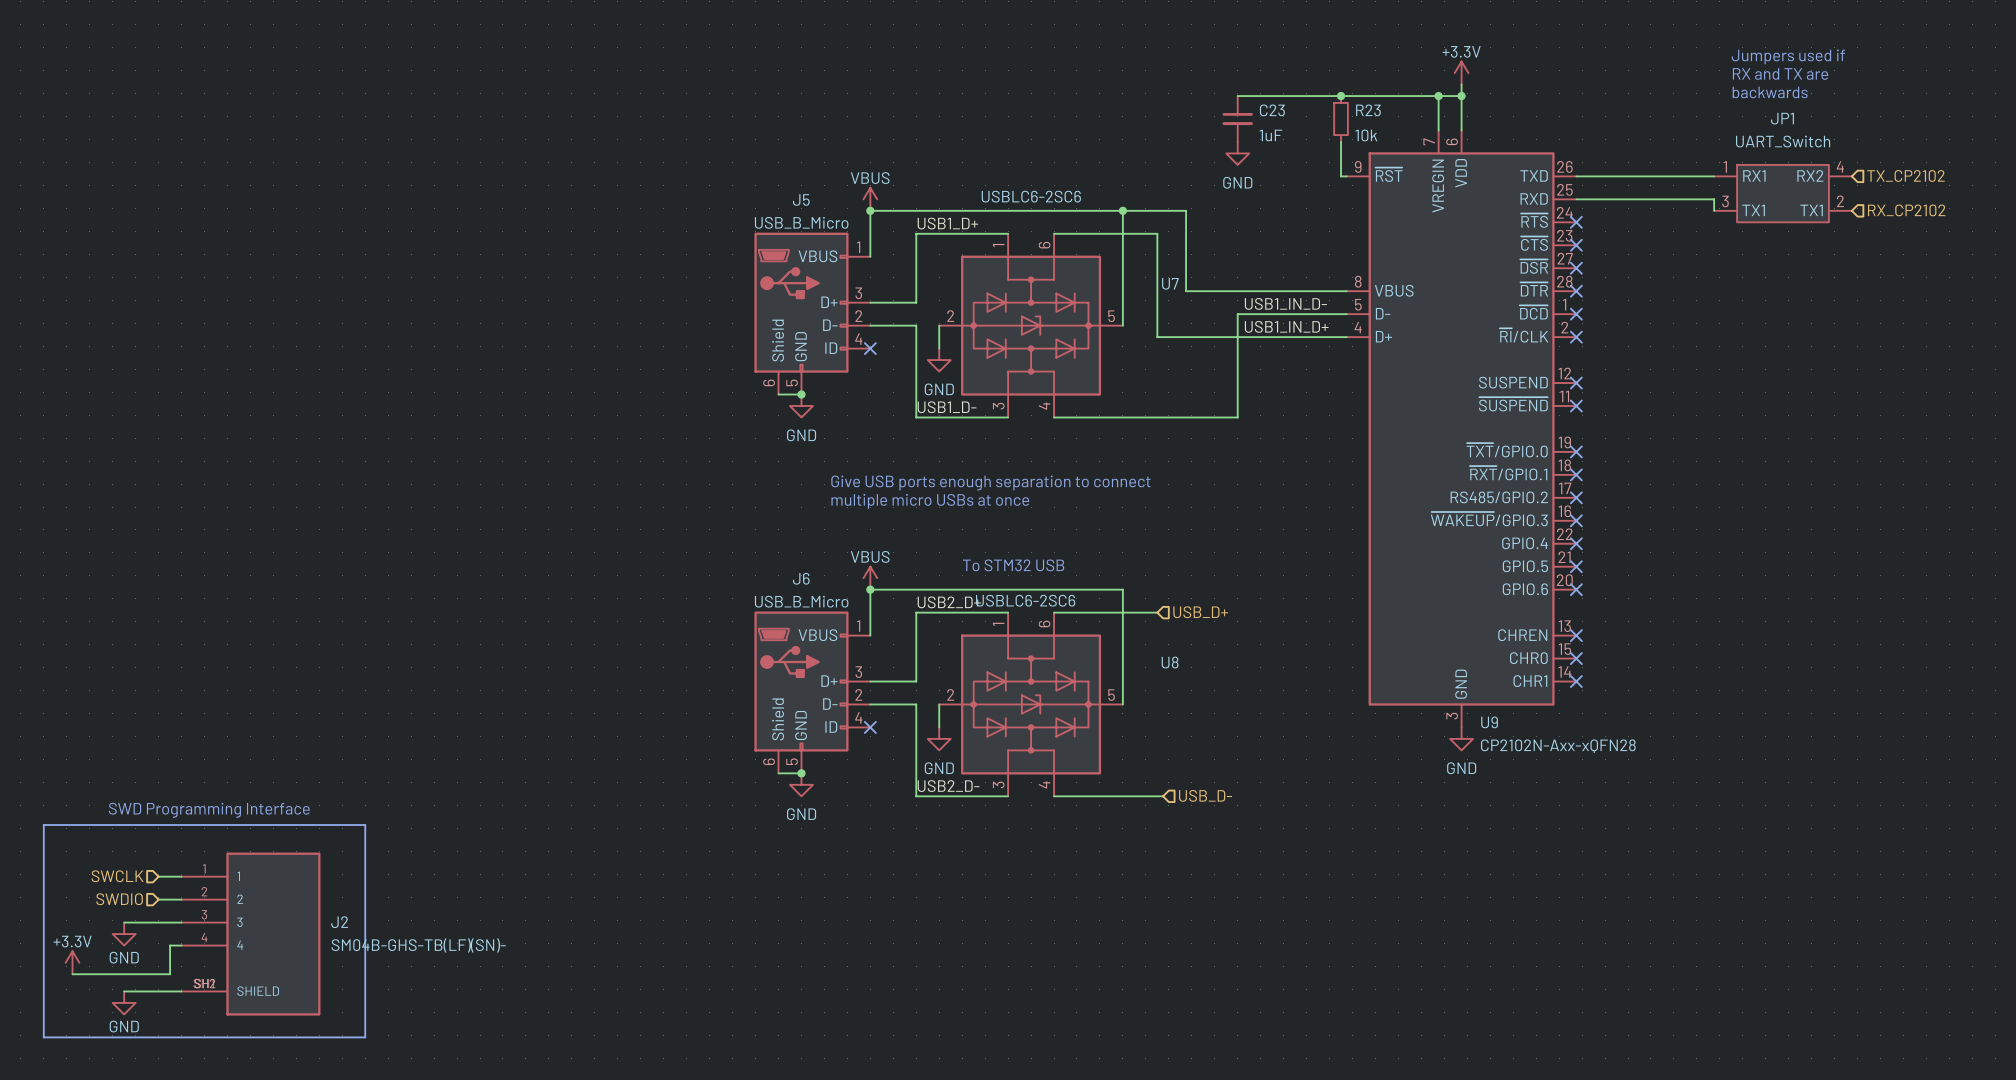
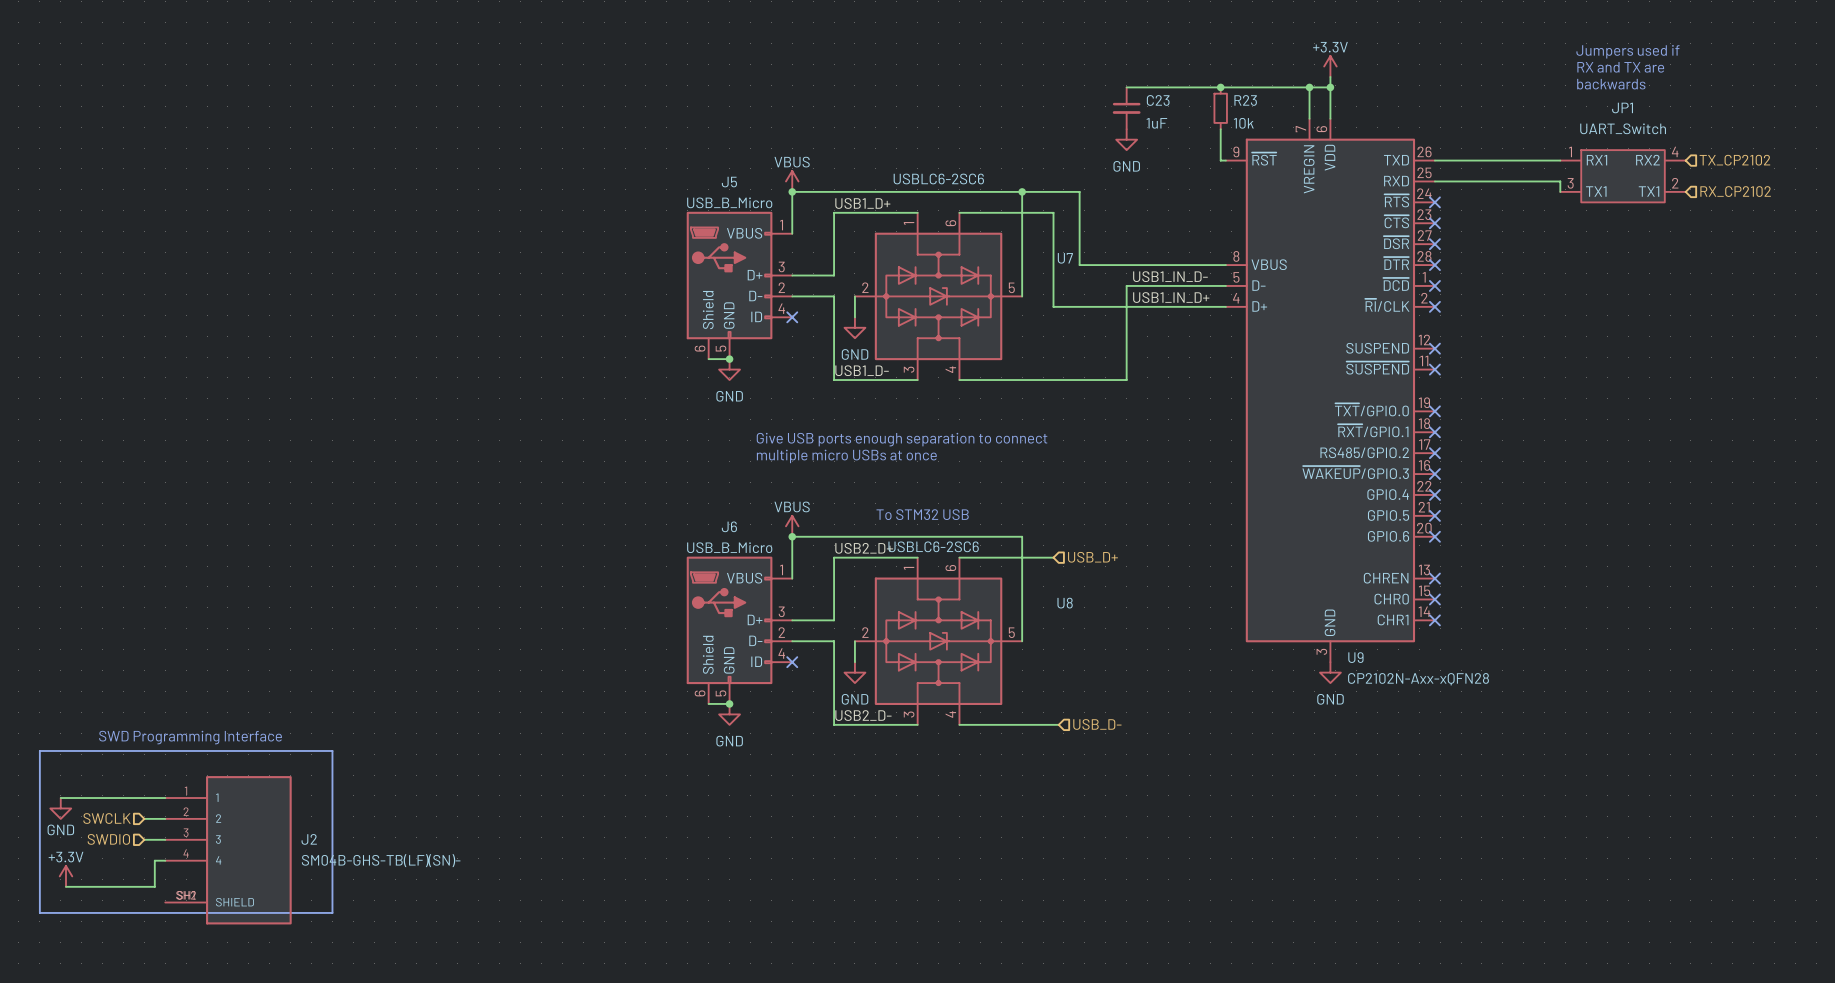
wire: none -> (60, 798) (144, 798)
hierarchical label: SWCLK (117, 876) -> none
power symbol: none -> GND (60, 808)
hierarchical label: SWDIO (119, 899) -> SWCLK (107, 818)
hierarchical label: none -> SWDIO (108, 839)
wire: (124, 922) (158, 922) -> none
power symbol: GND (124, 934) -> none
wire: (124, 991) (181, 991) -> none
line: (43, 1002) (43, 1037) (365, 1037) (365, 1002) -> (39, 912) (332, 912)
power symbol: GND (124, 1002) -> none

